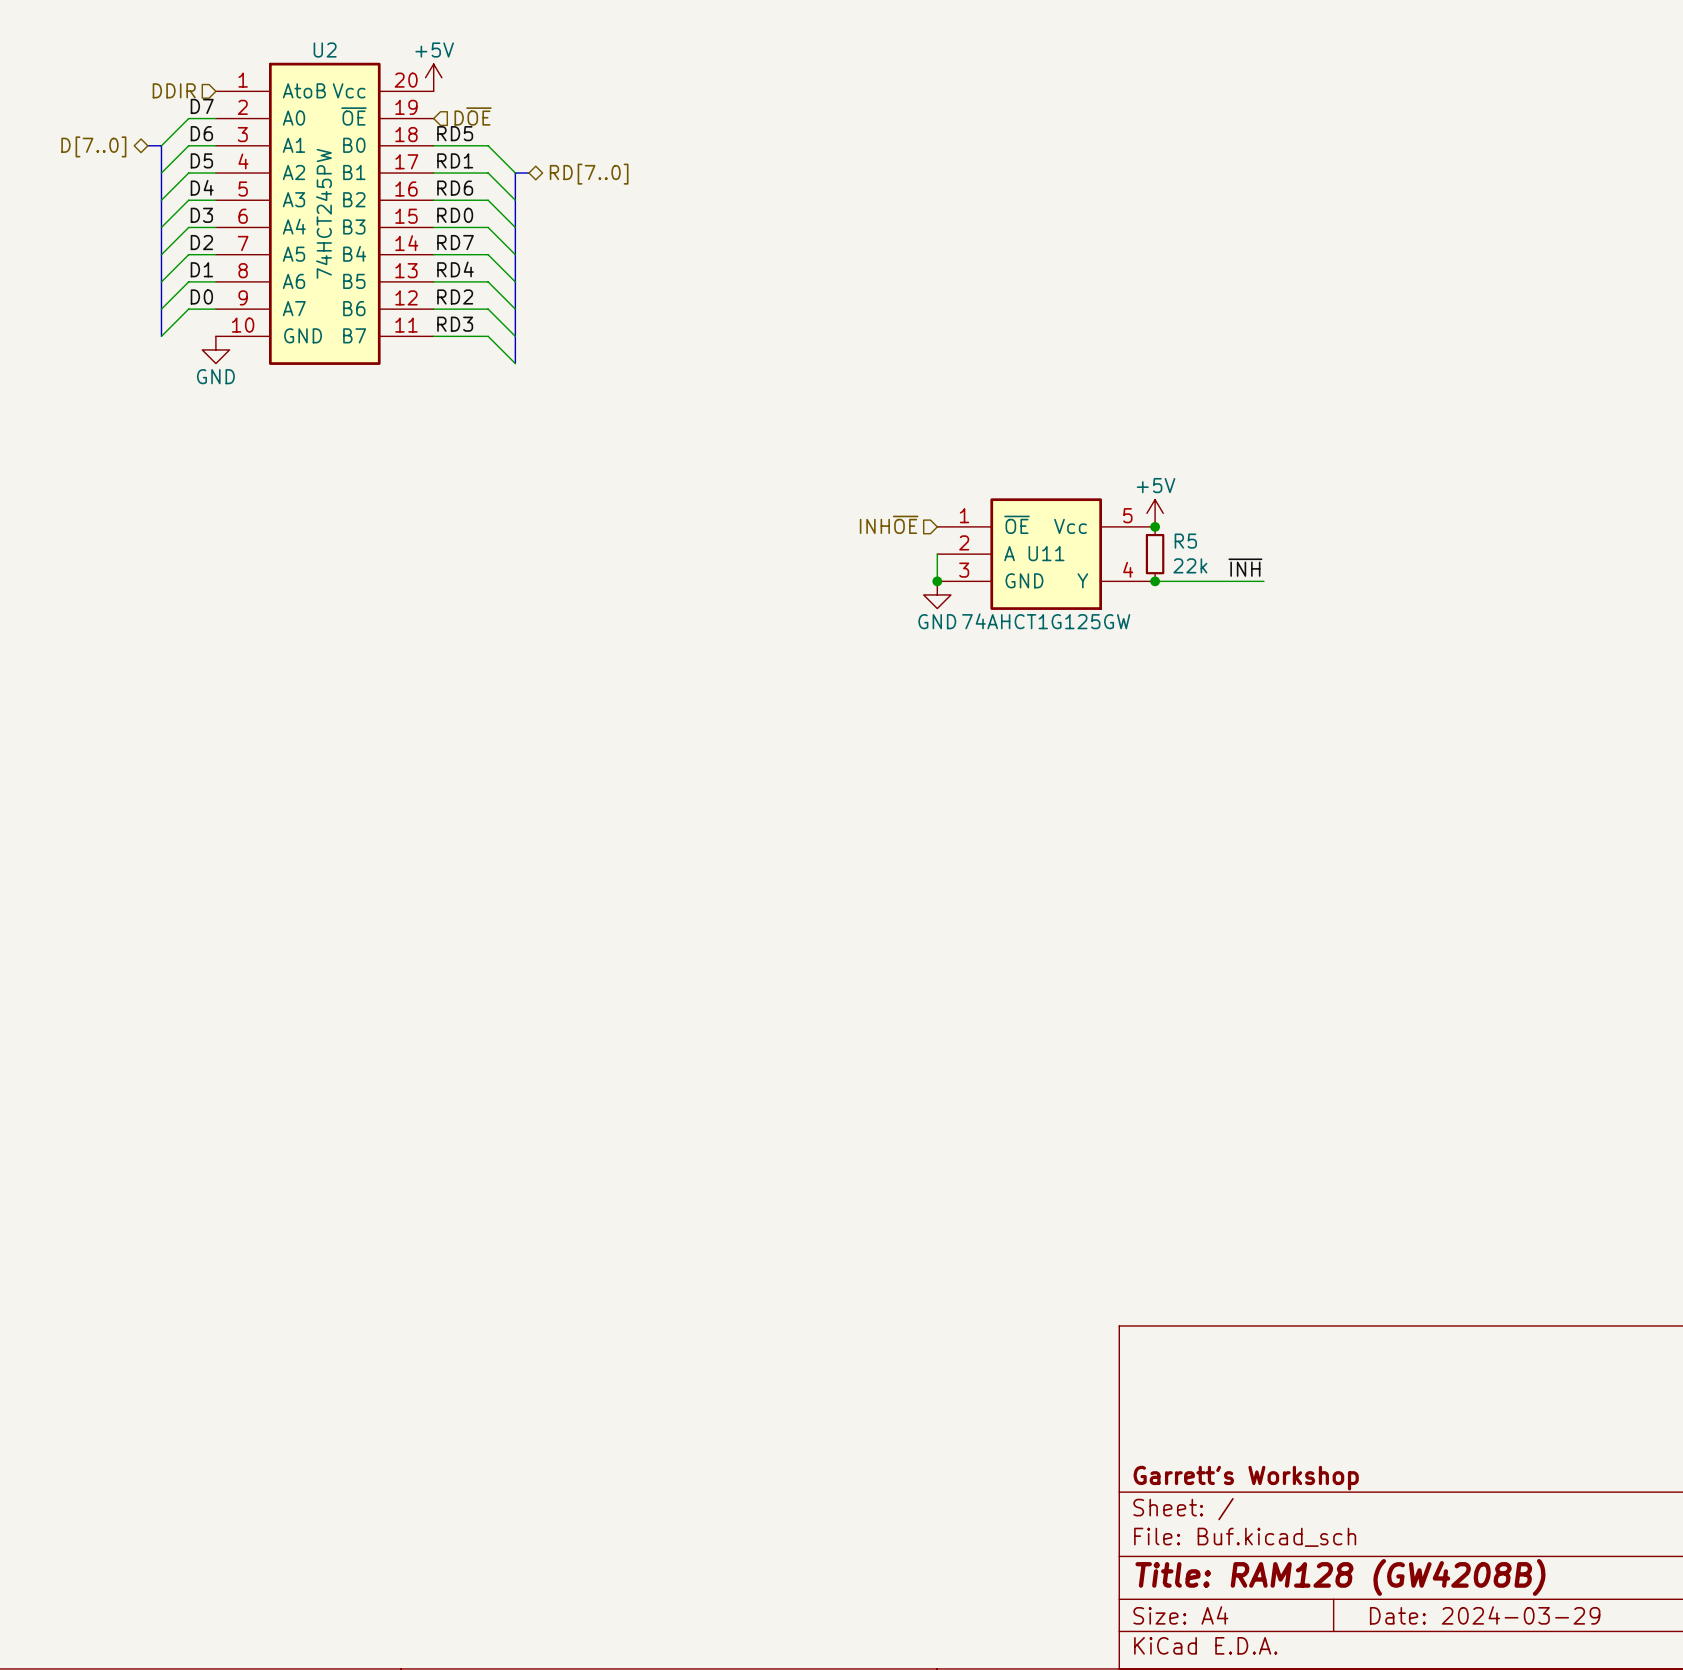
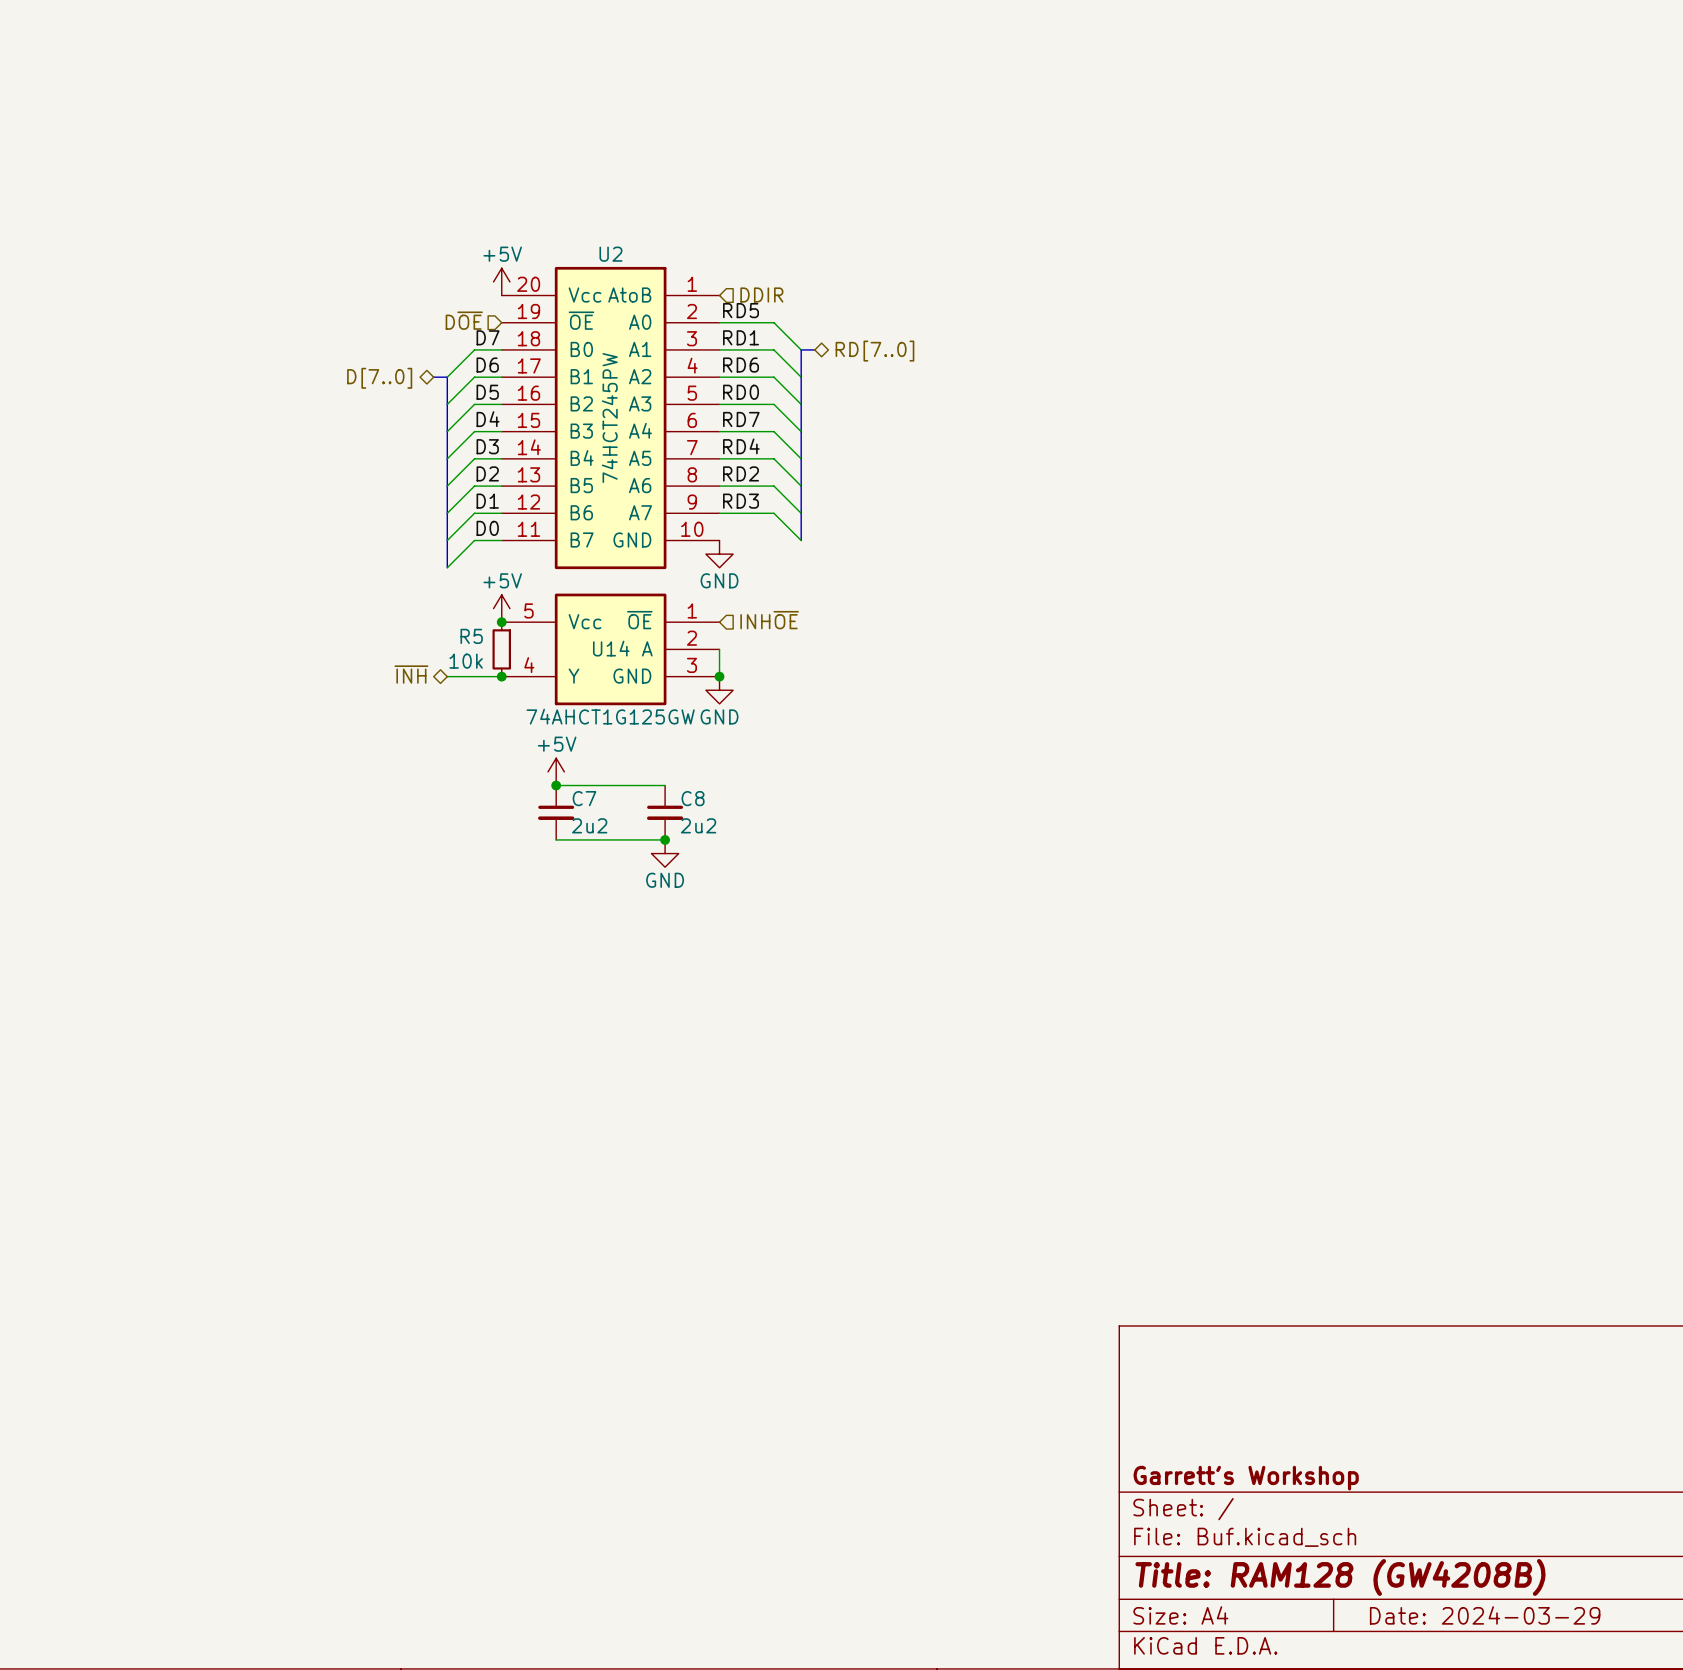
power symbol position: +5V (433, 77) -> +5V (501, 281)
hierarchical label: DDIR (174, 90) -> none
label: D7 (202, 106) -> none
hierarchical label rotation: 0° (473, 116) -> 180° (464, 320)
hierarchical label position: D~{OE} (473, 116) -> D~{OE} (464, 320)
wire: (215, 118) (188, 118) (161, 145) -> none
label: D6 (201, 133) -> none
label: RD5 (455, 133) -> none
bus: (147, 145) (161, 145) (161, 336) -> none
wire: (215, 145) (188, 145) (161, 173) -> none
wire: (433, 145) (488, 145) (515, 173) -> none
hierarchical label: D[7..0] (93, 146) -> none
label: D5 (201, 160) -> none
label: RD1 (455, 160) -> none
wire: (215, 173) (188, 173) (161, 200) -> none
wire: (433, 173) (488, 173) (515, 200) -> none
bus: (528, 173) (515, 173) (515, 363) -> none
hierarchical label: RD[7..0] (589, 174) -> none
label: D4 (202, 187) -> none
label: RD6 (455, 188) -> none
wire: (215, 200) (188, 200) (161, 227) -> none
wire: (433, 200) (488, 200) (515, 227) -> none
U2 flip: as is (324, 213) -> left-right (610, 418)
U2 position: (324, 213) -> (610, 418)
label: D3 (201, 215) -> none
label: RD0 (455, 215) -> none
wire: (215, 227) (188, 227) (161, 254) -> none
wire: (433, 227) (488, 227) (515, 254) -> none
label: D2 (201, 242) -> none
label: RD7 (455, 242) -> none
wire: (215, 254) (188, 254) (161, 281) -> none
wire: (433, 254) (488, 254) (515, 281) -> none
label: D1 (201, 269) -> none
label: RD4 (455, 269) -> none
wire: (215, 281) (188, 281) (161, 309) -> none
wire: (433, 281) (488, 281) (515, 309) -> none
hierarchical label: none -> DDIR (761, 295)
label: D0 (201, 296) -> none
label: RD2 (455, 296) -> none
wire: (215, 309) (188, 309) (161, 336) -> none
wire: (433, 309) (488, 309) (515, 336) -> none
label: none -> RD5 (741, 310)
wire: none -> (719, 322) (773, 322) (801, 349)
label: RD3 (455, 324) -> none
wire: (433, 336) (488, 336) (515, 363) -> none
label: none -> D7 (488, 337)
label: none -> RD1 (741, 337)
power symbol: GND (215, 349) -> none
wire: none -> (501, 349) (474, 349) (447, 377)
wire: none -> (719, 349) (773, 349) (801, 377)
bus: none -> (814, 349) (801, 349) (801, 540)
hierarchical label: none -> RD[7..0] (874, 351)
label: none -> D6 (487, 365)
label: none -> RD6 (741, 365)
bus: none -> (433, 377) (447, 377) (447, 567)
wire: none -> (501, 377) (474, 377) (447, 404)
wire: none -> (719, 377) (773, 377) (801, 404)
hierarchical label: none -> D[7..0] (379, 378)
label: none -> D5 (487, 392)
label: none -> RD0 (741, 392)
wire: none -> (501, 404) (474, 404) (447, 431)
wire: none -> (719, 404) (773, 404) (801, 431)
label: none -> D4 (488, 419)
label: none -> RD7 (741, 419)
wire: none -> (501, 431) (474, 431) (447, 458)
wire: none -> (719, 431) (773, 431) (801, 458)
label: none -> D3 (487, 446)
label: none -> RD4 (741, 446)
wire: none -> (501, 458) (474, 458) (447, 486)
wire: none -> (719, 458) (773, 458) (801, 486)
label: none -> D2 (487, 473)
label: none -> RD2 (741, 473)
wire: none -> (501, 486) (474, 486) (447, 513)
wire: none -> (719, 486) (773, 486) (801, 513)
label: none -> D1 (487, 501)
label: none -> RD3 (741, 501)
wire: none -> (501, 513) (474, 513) (447, 540)
wire: none -> (719, 513) (773, 513) (801, 540)
power symbol: +5V (1155, 513) -> none
hierarchical label rotation: 0° (889, 524) -> 180° (769, 620)
junction: (1155, 526) -> none
label: none -> D0 (487, 528)
wire: none -> (501, 540) (474, 540) (447, 567)
R5 name position: R5 (1185, 541) -> R5 (471, 636)
power symbol: none -> GND (719, 554)
wire: (937, 554) (937, 581) -> (719, 649) (719, 676)
U11: 74AHCT1G125GW (1046, 554) -> none
R5 position: (1155, 554) -> (501, 649)
R5 value: 22k (1190, 565) -> 10k (466, 661)
label: ~{INH} (1245, 567) -> none
junction: (937, 581) -> none
wire: (1155, 581) (1263, 581) -> none
junction: (1155, 581) -> none
power symbol: GND (937, 594) -> none
power symbol: none -> +5V (501, 608)
junction: none -> (501, 622)
U14: none -> 74AHCT1G125GW (610, 649)
hierarchical label: none -> ~{INH} (411, 674)
wire: none -> (447, 676) (501, 676)
junction: none -> (501, 676)
junction: none -> (719, 676)
power symbol: none -> GND (719, 690)
power symbol: none -> +5V (556, 771)
wire: none -> (556, 785) (665, 785)
junction: none -> (556, 785)
C7: none -> 2u2 (556, 812)
C8: none -> 2u2 (665, 812)
wire: none -> (556, 839) (665, 839)
junction: none -> (665, 839)
power symbol: none -> GND (665, 853)

